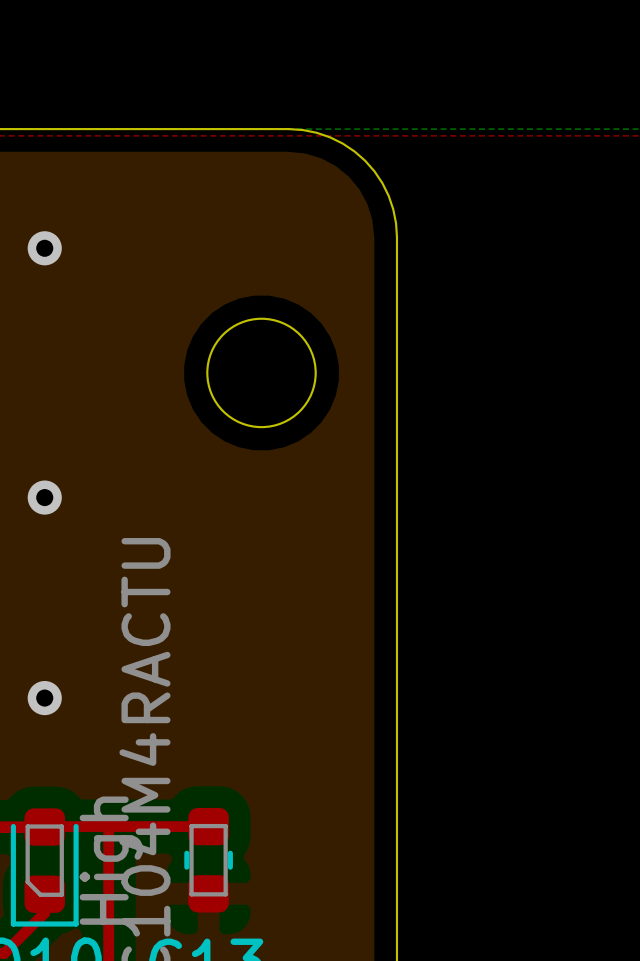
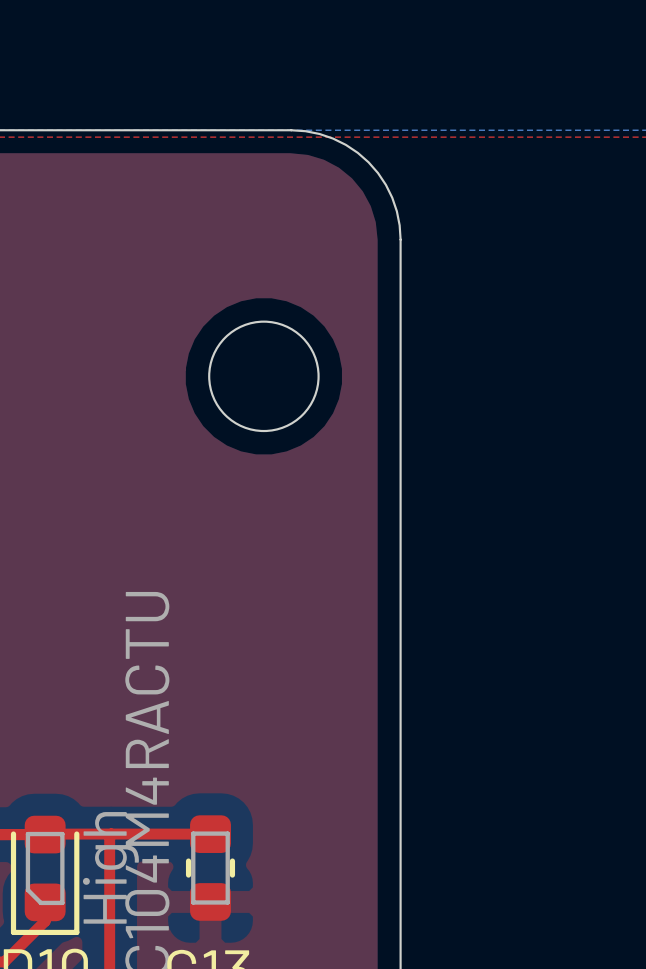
via: (44, 248) -> none
via: (44, 497) -> none
via: (44, 698) -> none

